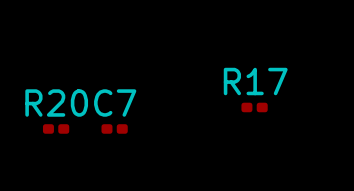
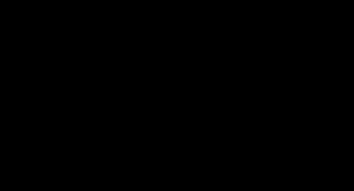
R17: (254, 107) -> none
R20: (56, 128) -> none
C7: (114, 128) -> none

